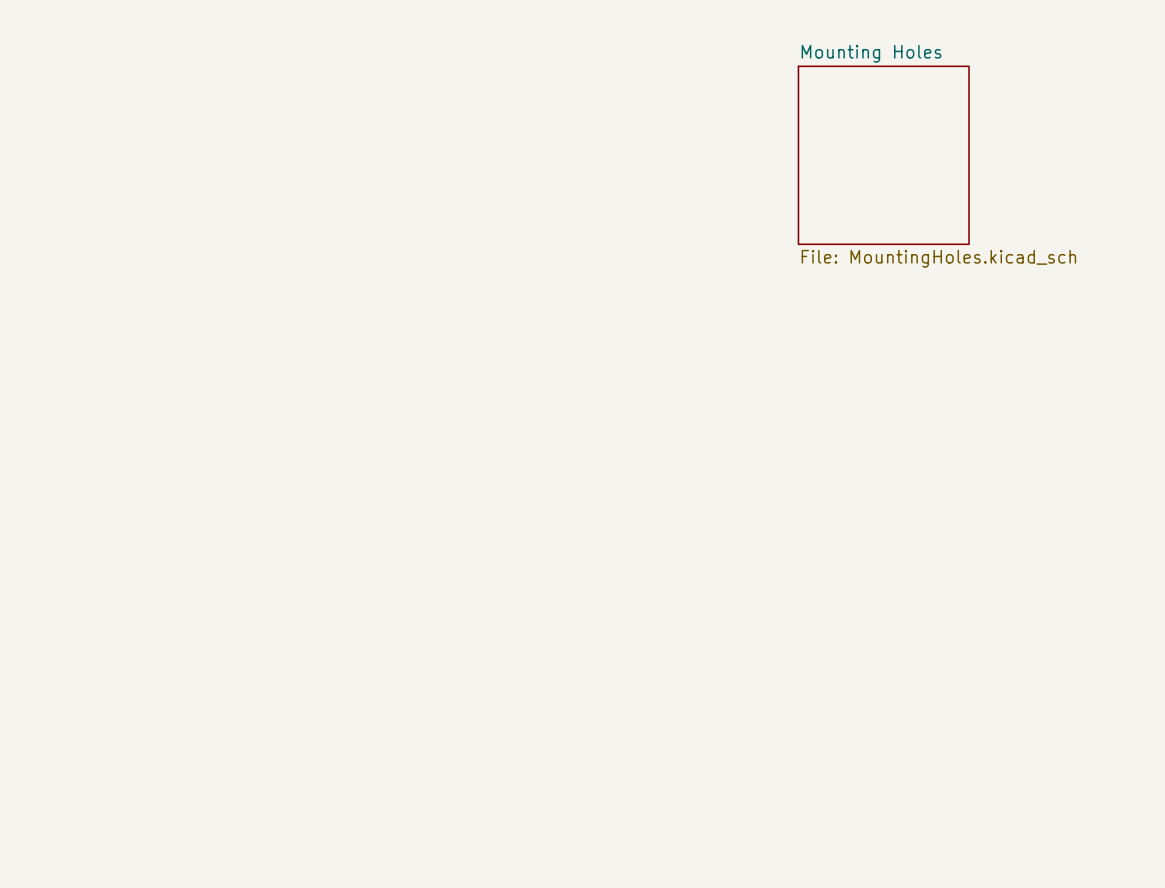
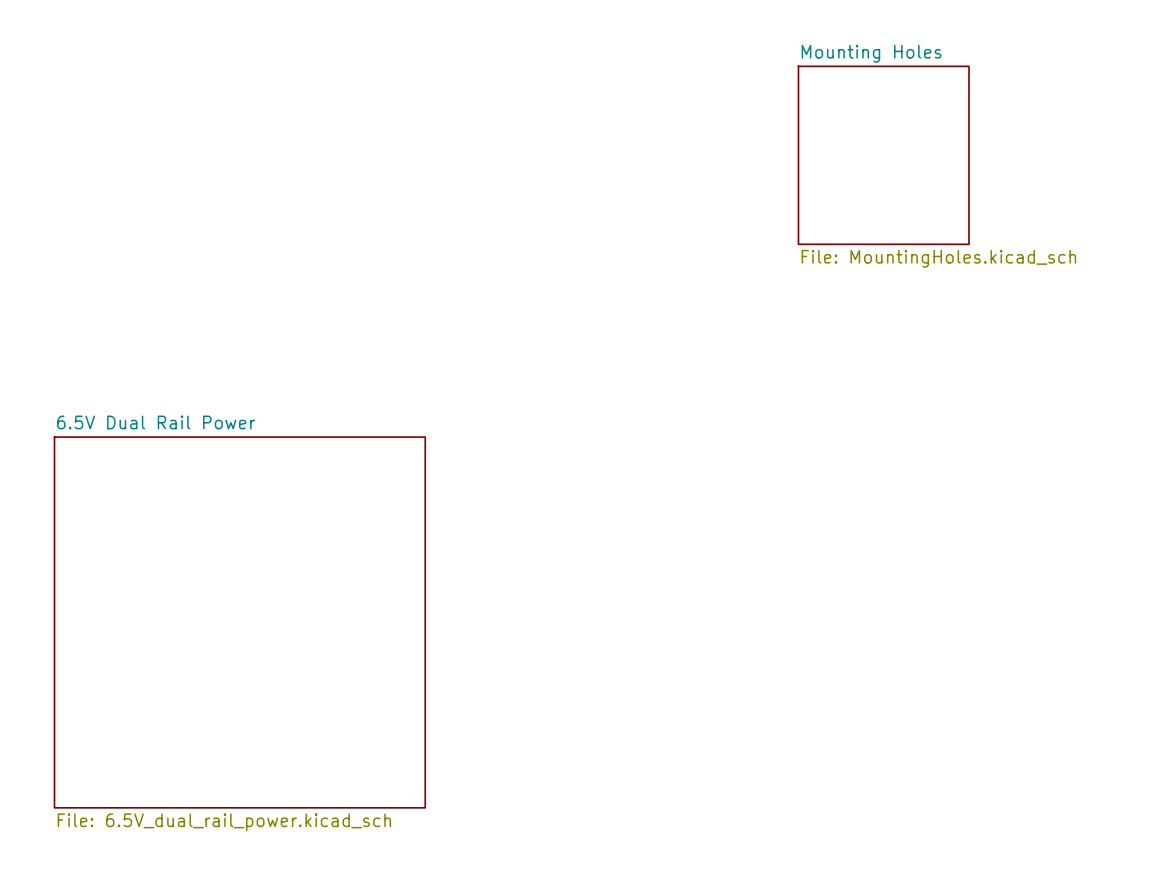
sheet 6.5V Dual Rail Power: none -> File: 6.5V_dual_rail_power.kicad_sch (239, 622)

